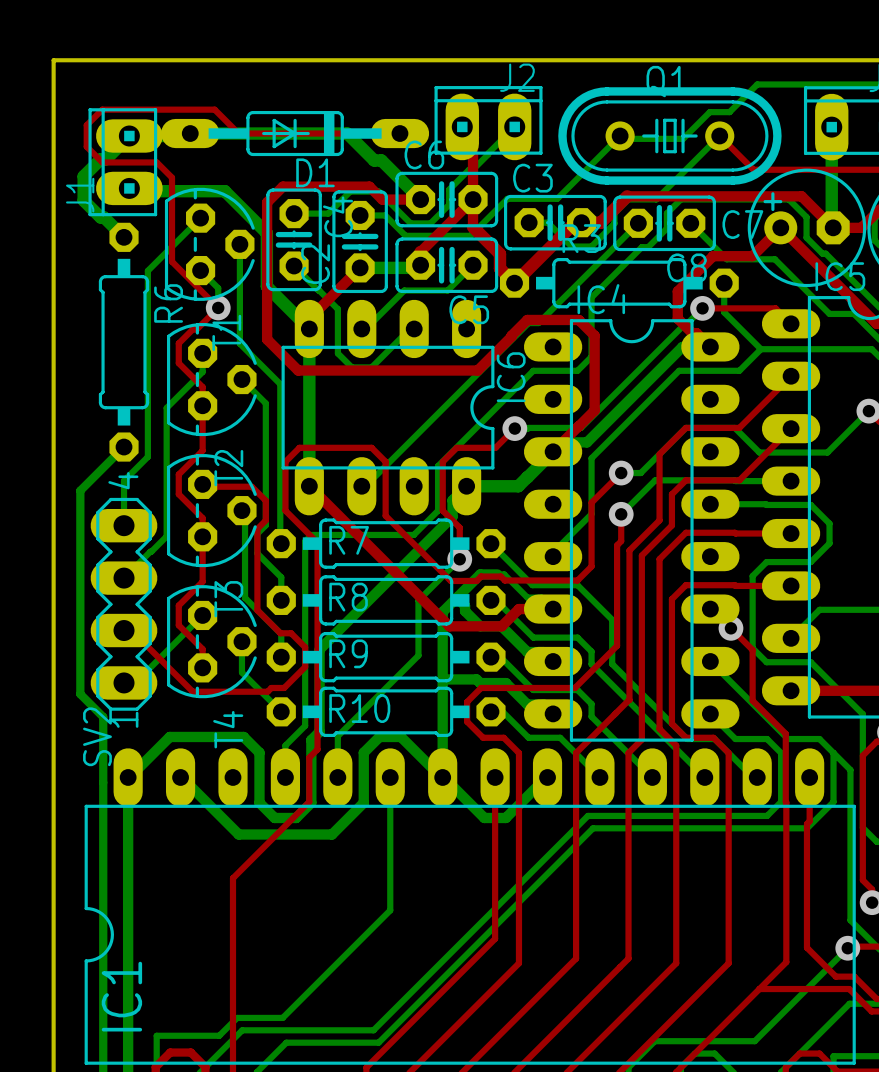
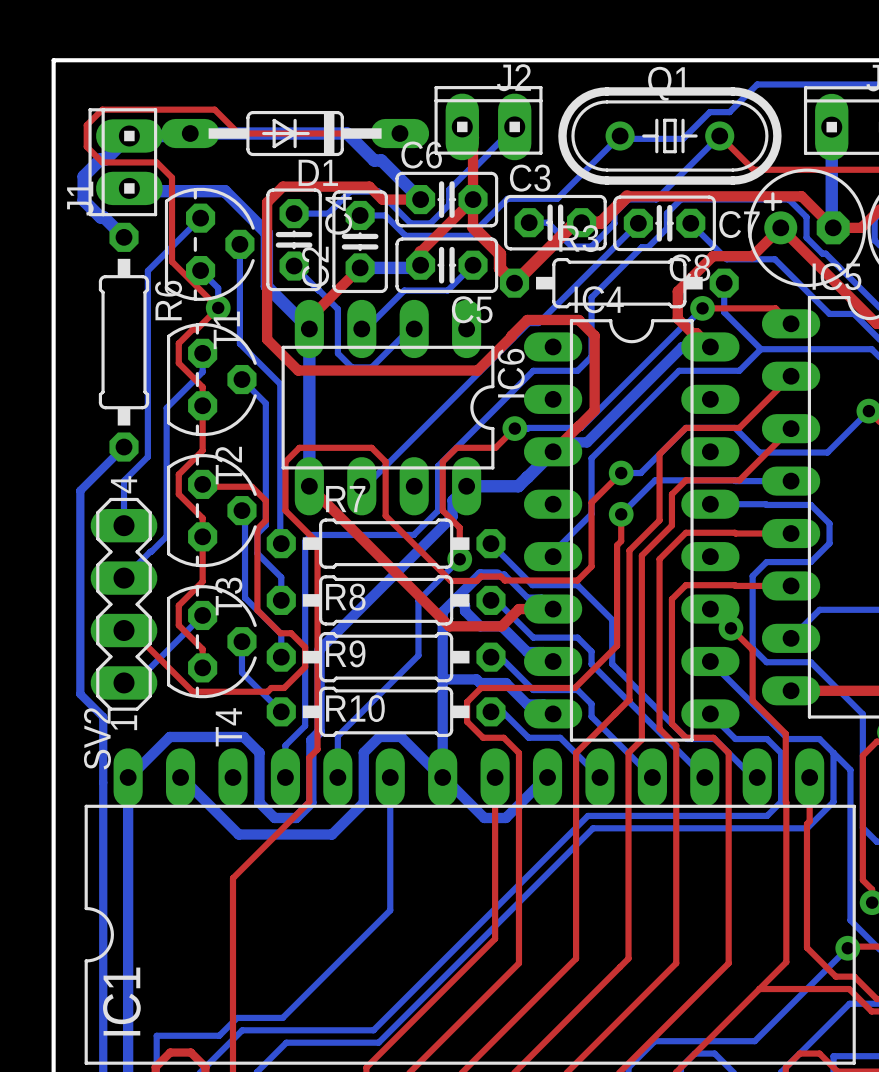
R7 name position: R7 (349, 540) -> R7 (345, 499)

